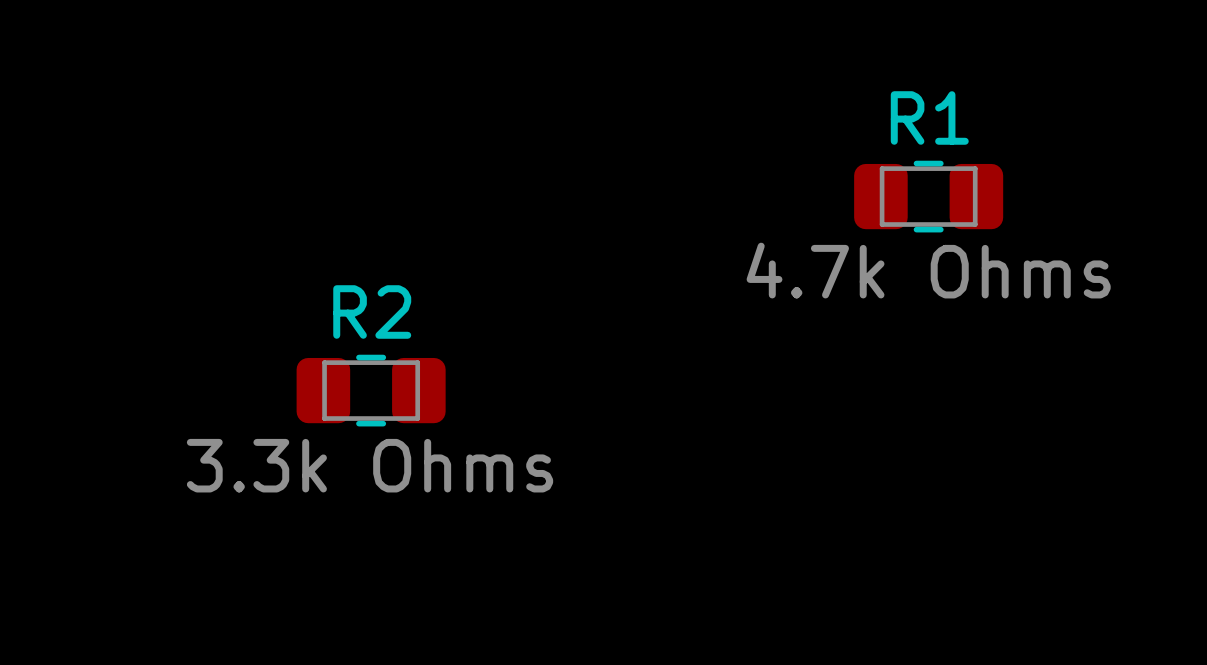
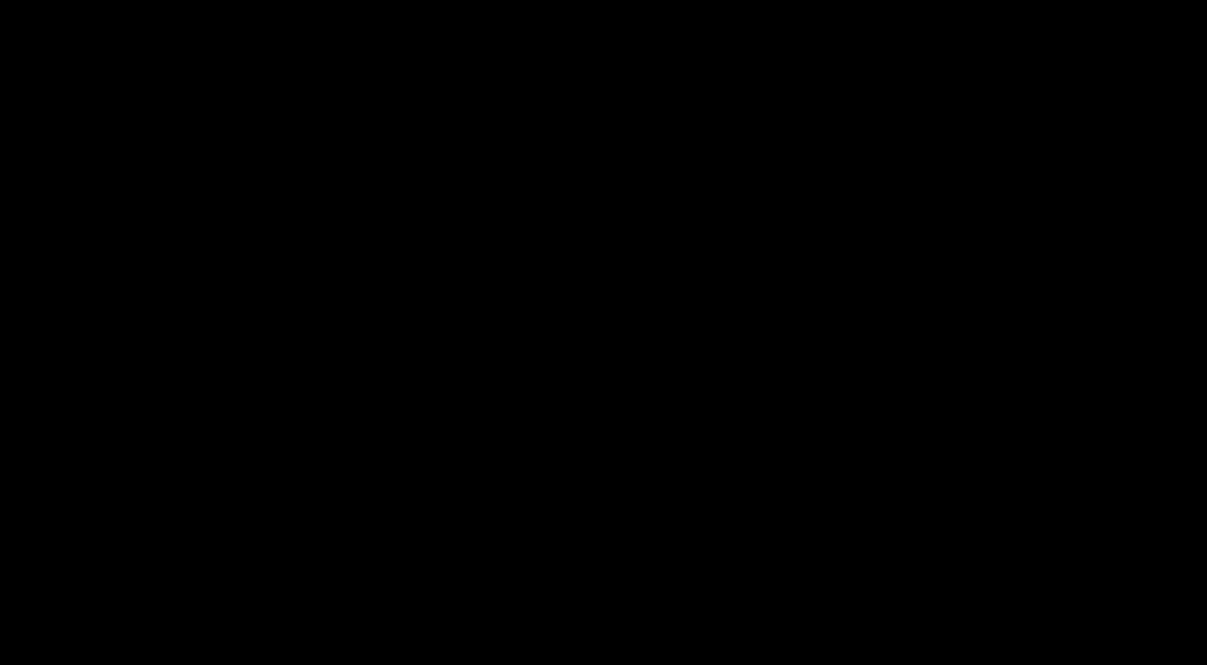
R1: 4.7k Ohms (928, 196) -> none
R2: 3.3k Ohms (371, 390) -> none

